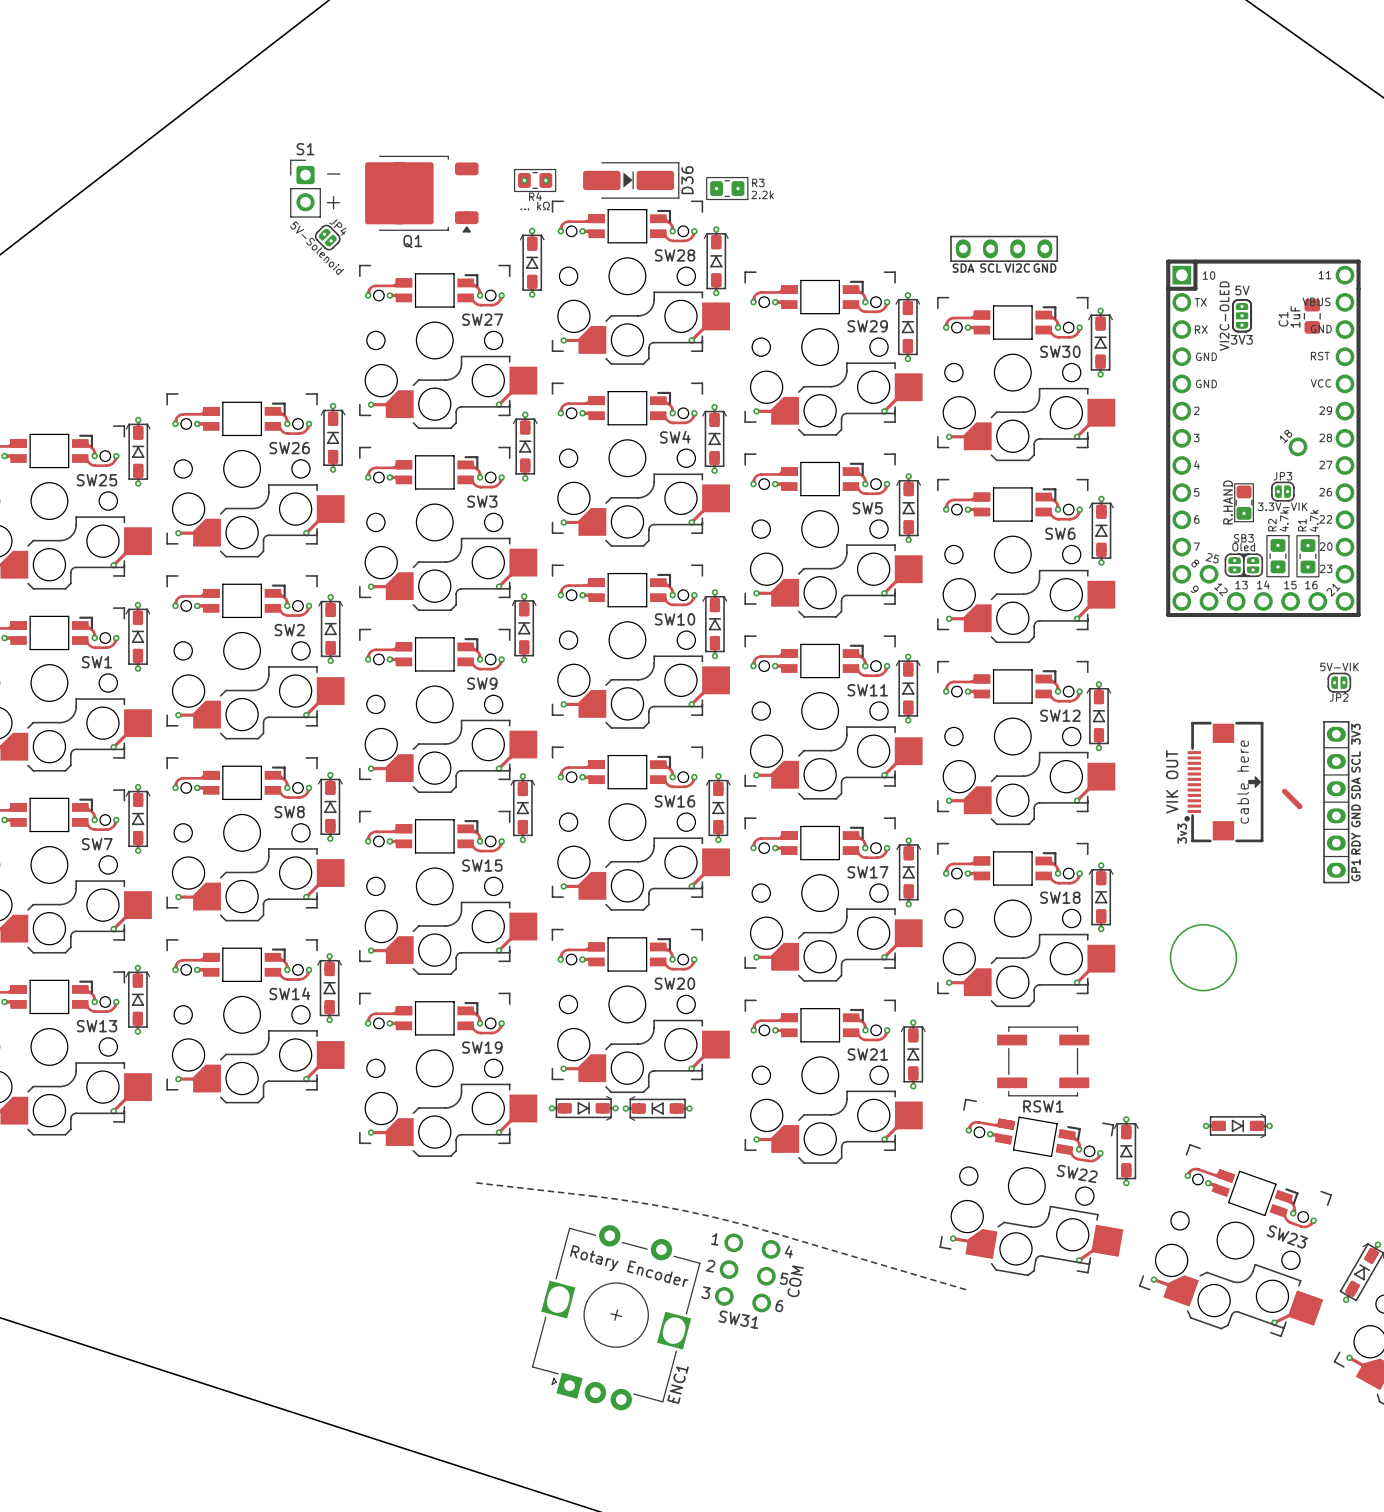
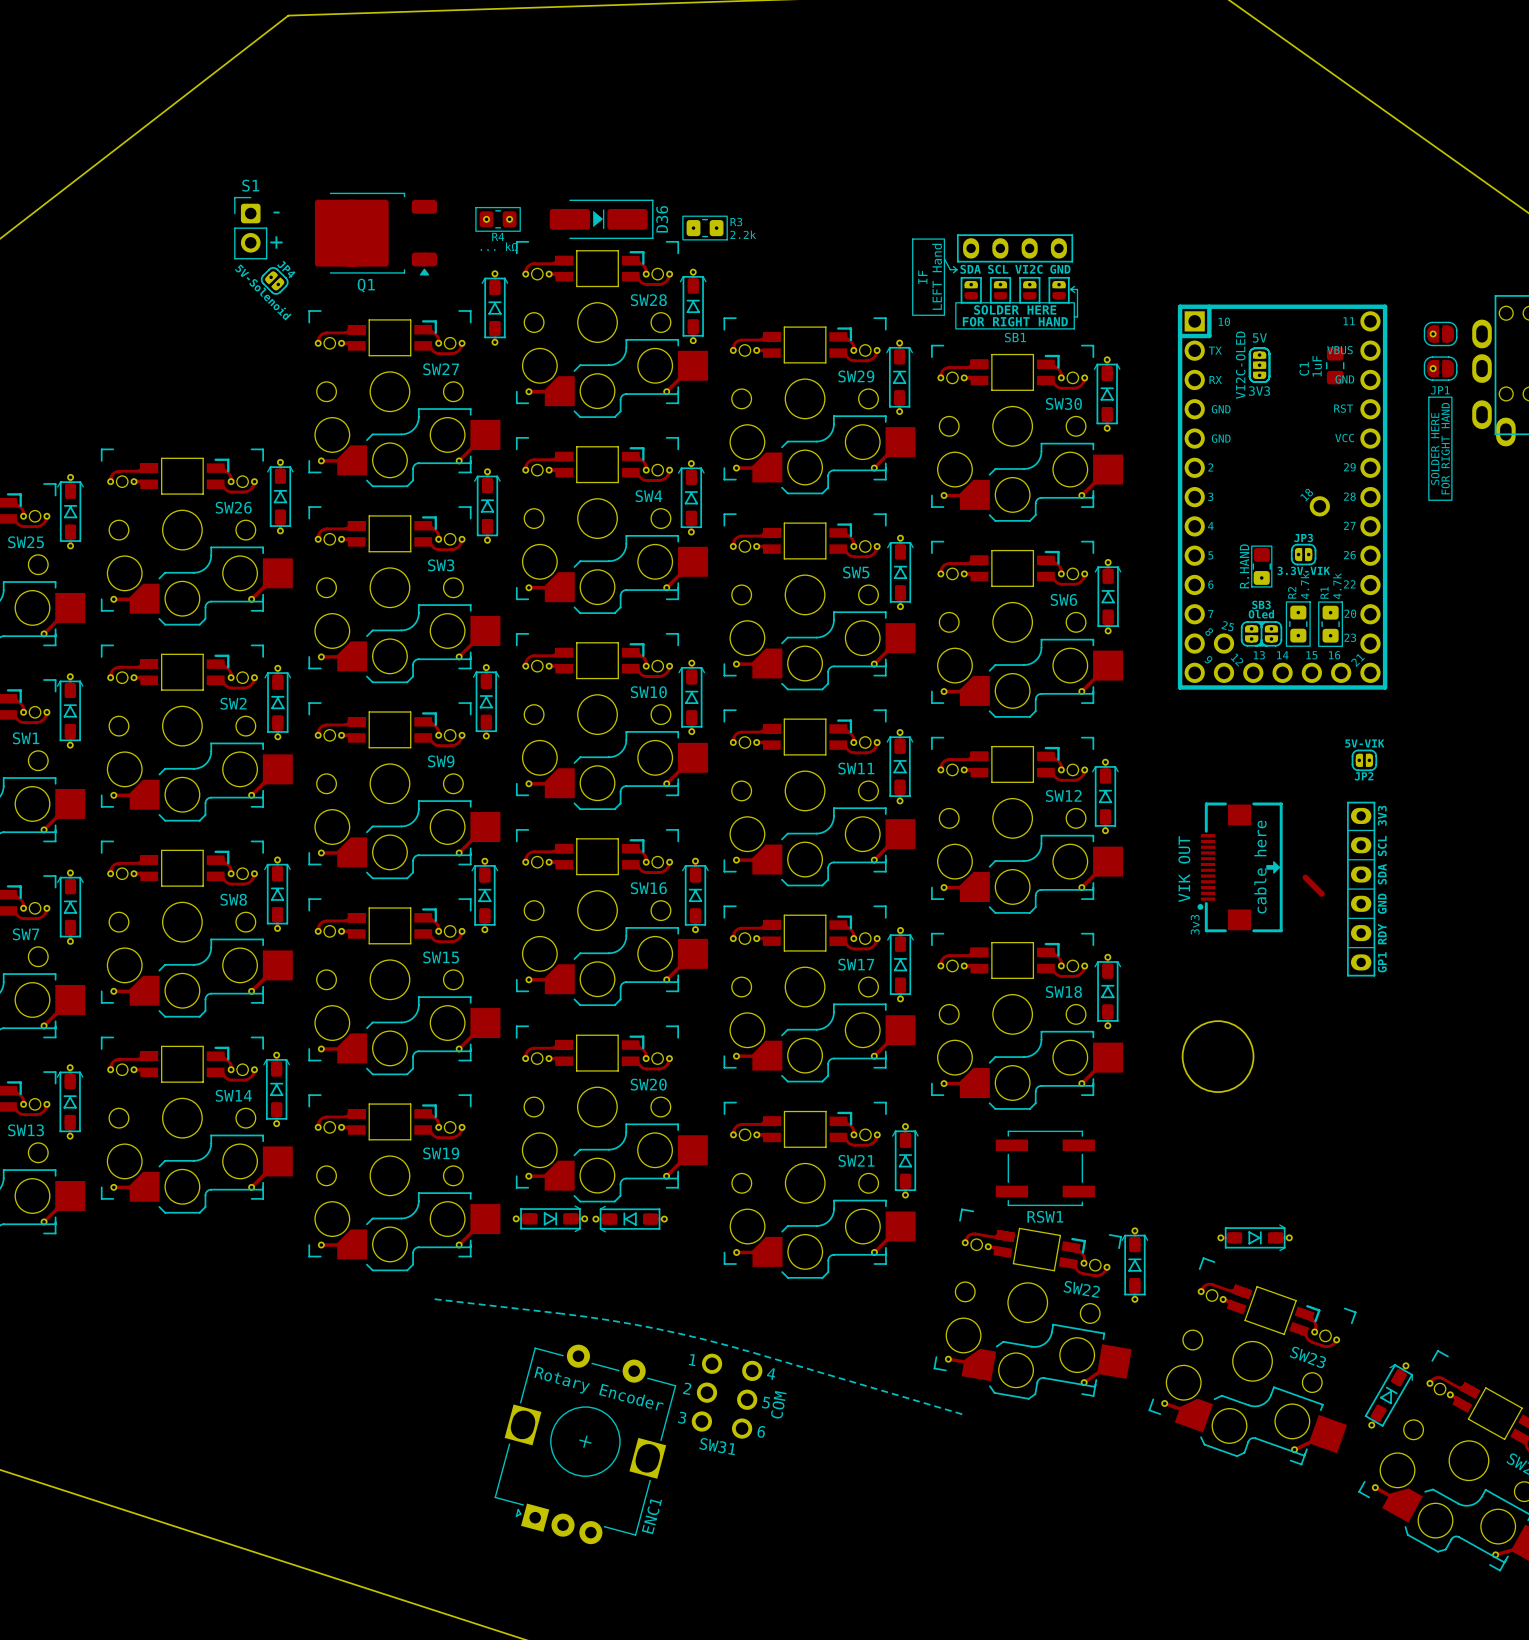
part: none -> (992, 275)
part: (1004, 248) -> none
SB1: none -> (1016, 303)

